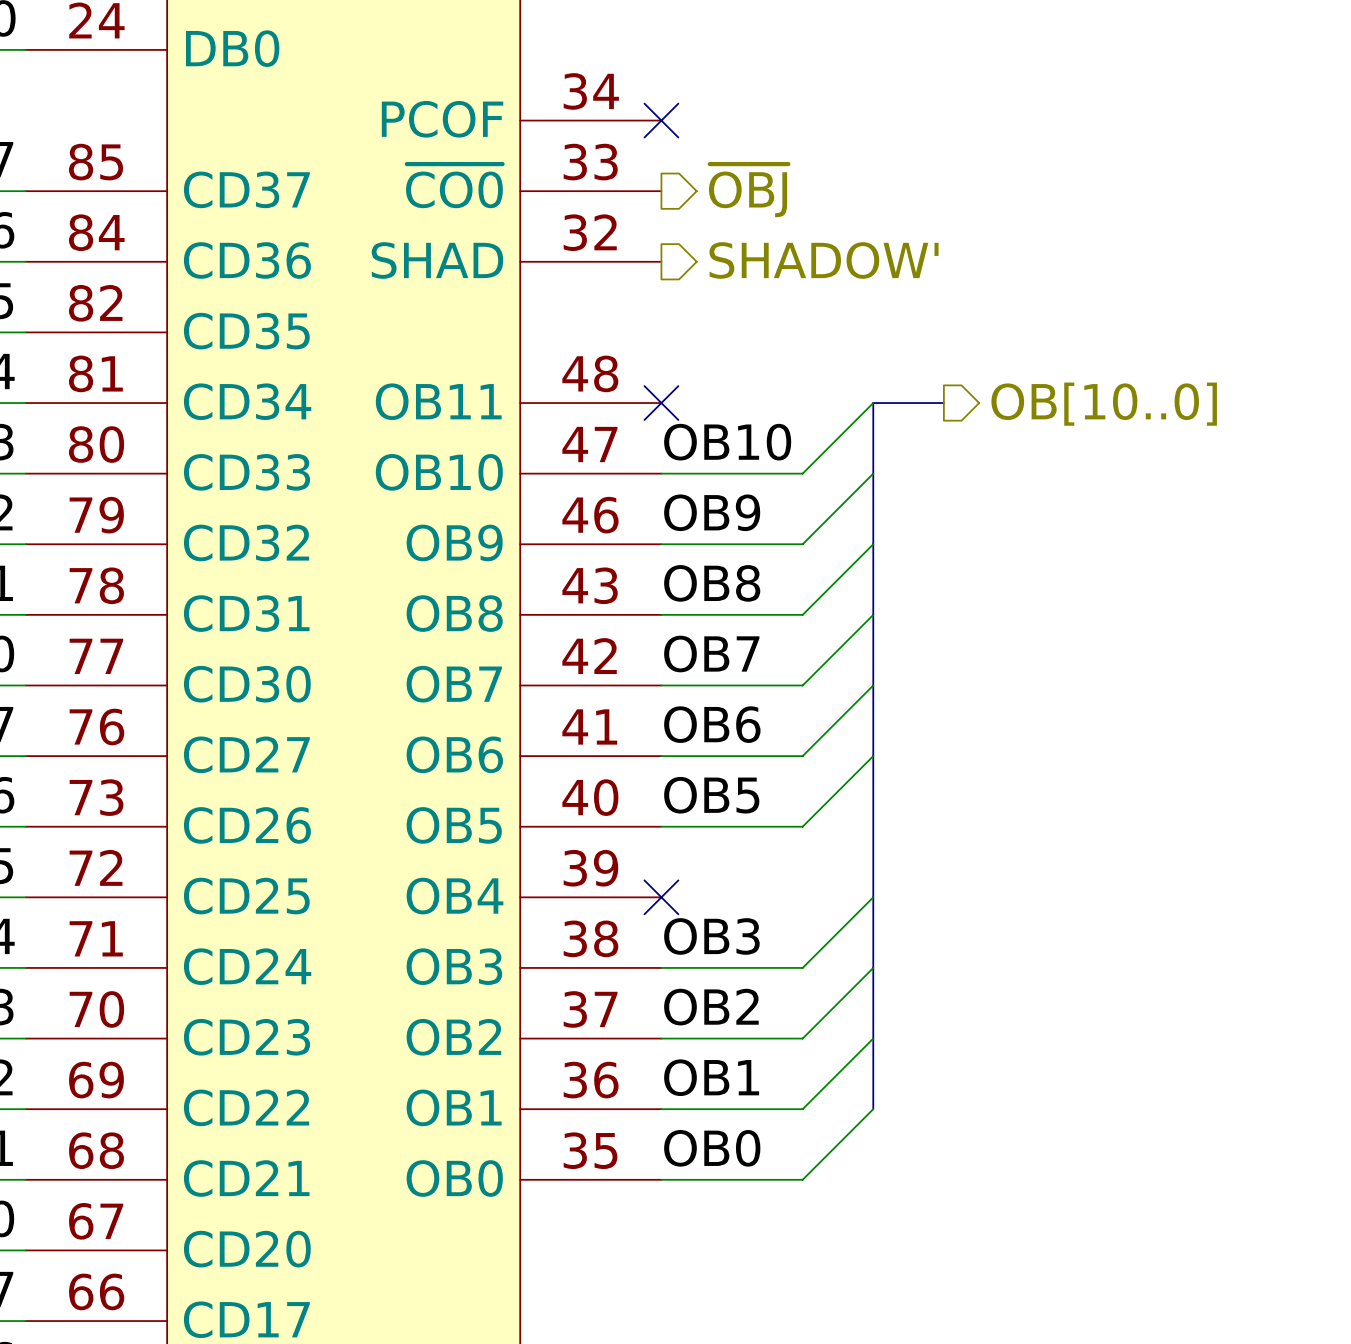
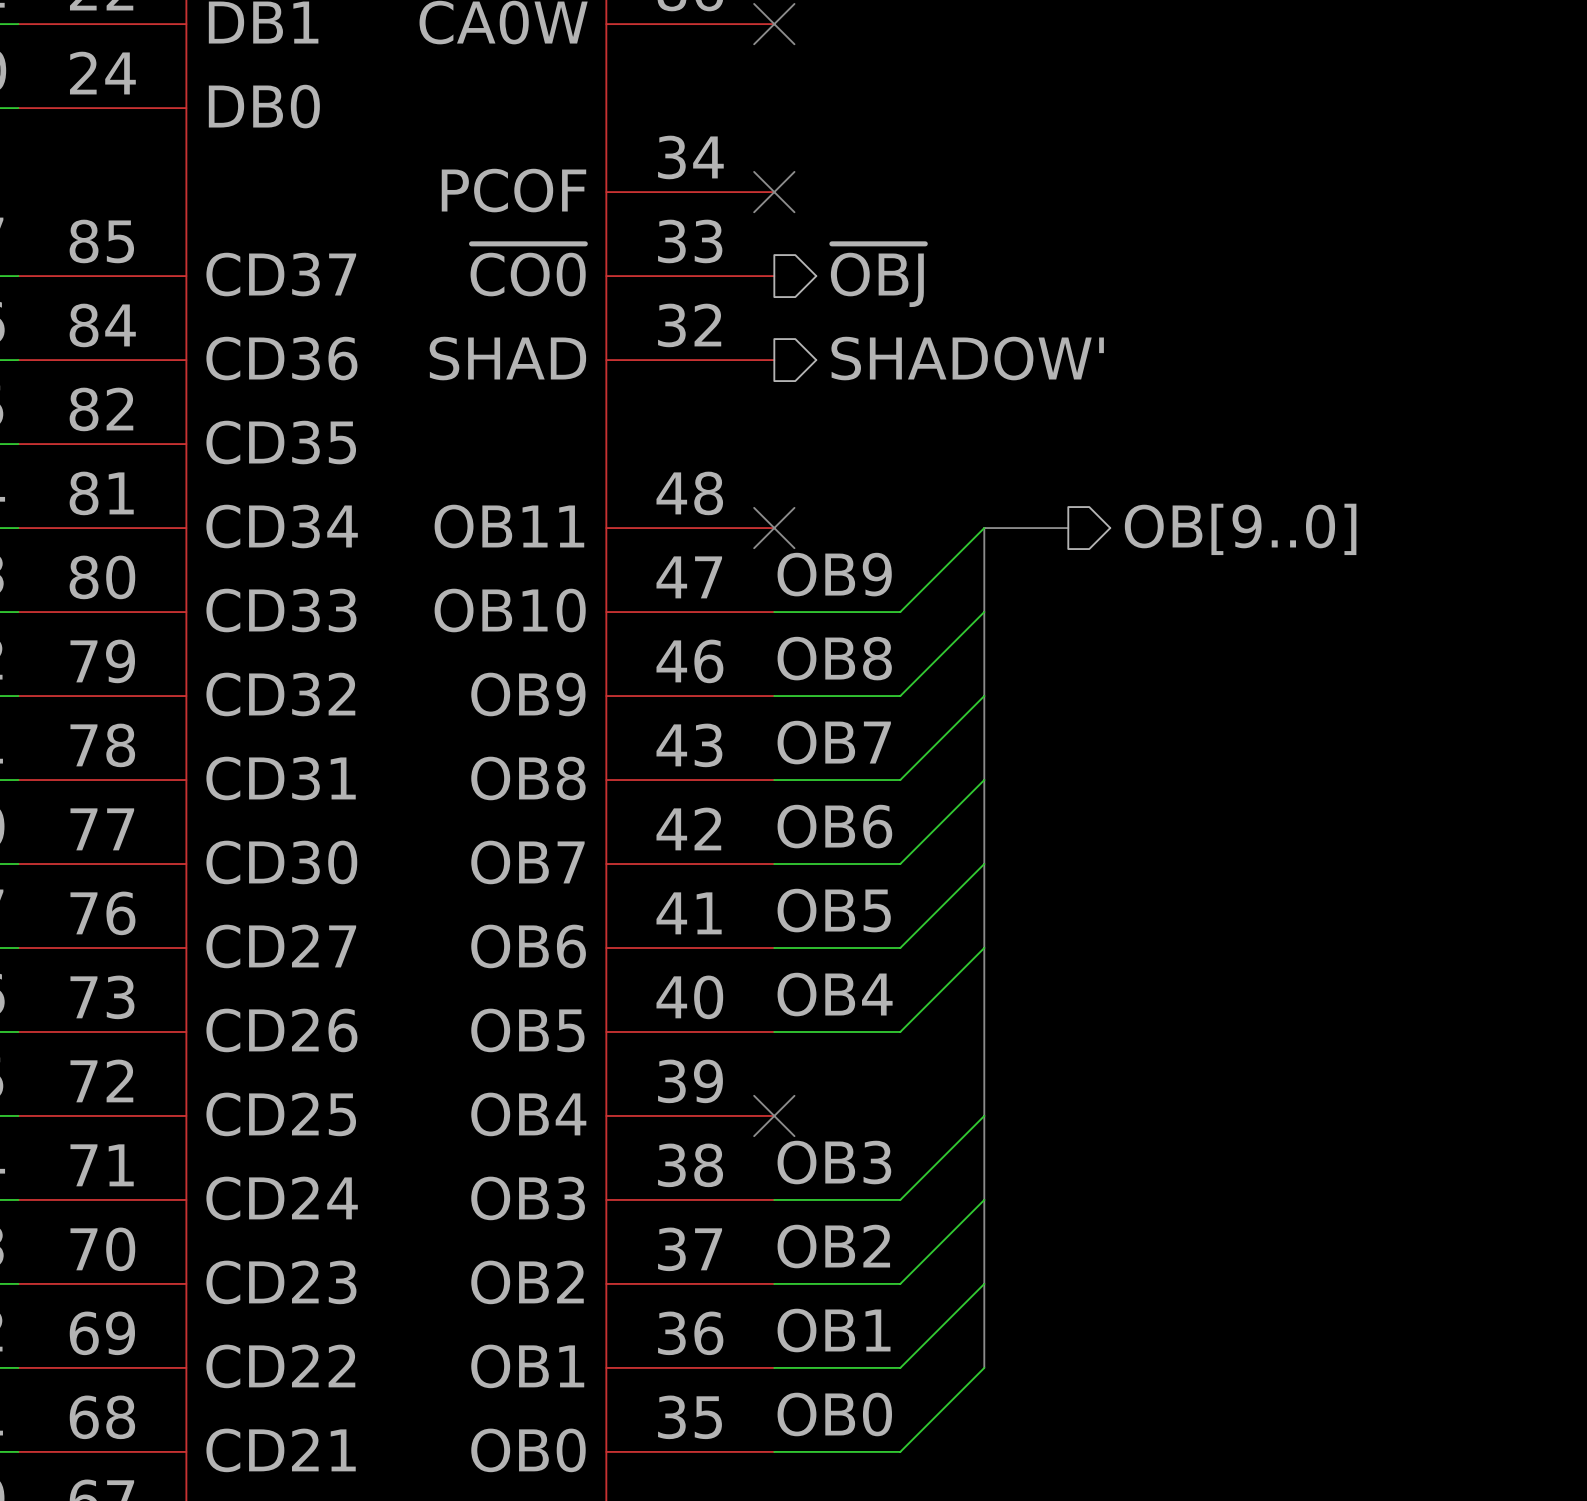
wire: (873, 403) (802, 473) (767, 473) -> (984, 528) (900, 612)
bus: (873, 403) (873, 1109) -> (1026, 528) (984, 528) (984, 1367)
bus: (908, 403) (943, 403) -> none
hierarchical label: OB[10..0] (1104, 404) -> OB[9..0] (1240, 529)
label: OB10 (727, 442) -> OB9 (834, 574)
wire: (873, 473) (802, 544) (767, 544) -> (984, 612) (900, 696)
label: OB9 (712, 512) -> OB8 (834, 658)
wire: (873, 544) (802, 614) (767, 614) -> (984, 696) (900, 780)
label: OB8 (712, 583) -> OB7 (834, 742)
wire: (873, 614) (802, 685) (767, 685) -> (984, 780) (900, 864)
label: OB7 (711, 654) -> OB6 (834, 826)
wire: (873, 685) (802, 756) (767, 756) -> (984, 864) (900, 948)
label: OB6 (712, 724) -> OB5 (834, 910)
wire: (873, 756) (802, 826) (767, 826) -> (984, 948) (900, 1031)
label: OB5 (711, 795) -> OB4 (835, 994)
wire: (873, 897) (802, 967) (767, 967) -> (984, 1115) (900, 1199)
wire: (873, 967) (802, 1038) (767, 1038) -> (984, 1199) (900, 1283)
wire: (873, 1038) (802, 1109) (767, 1109) -> (984, 1283) (900, 1367)
wire: (873, 1109) (802, 1179) (767, 1179) -> (984, 1367) (900, 1451)

